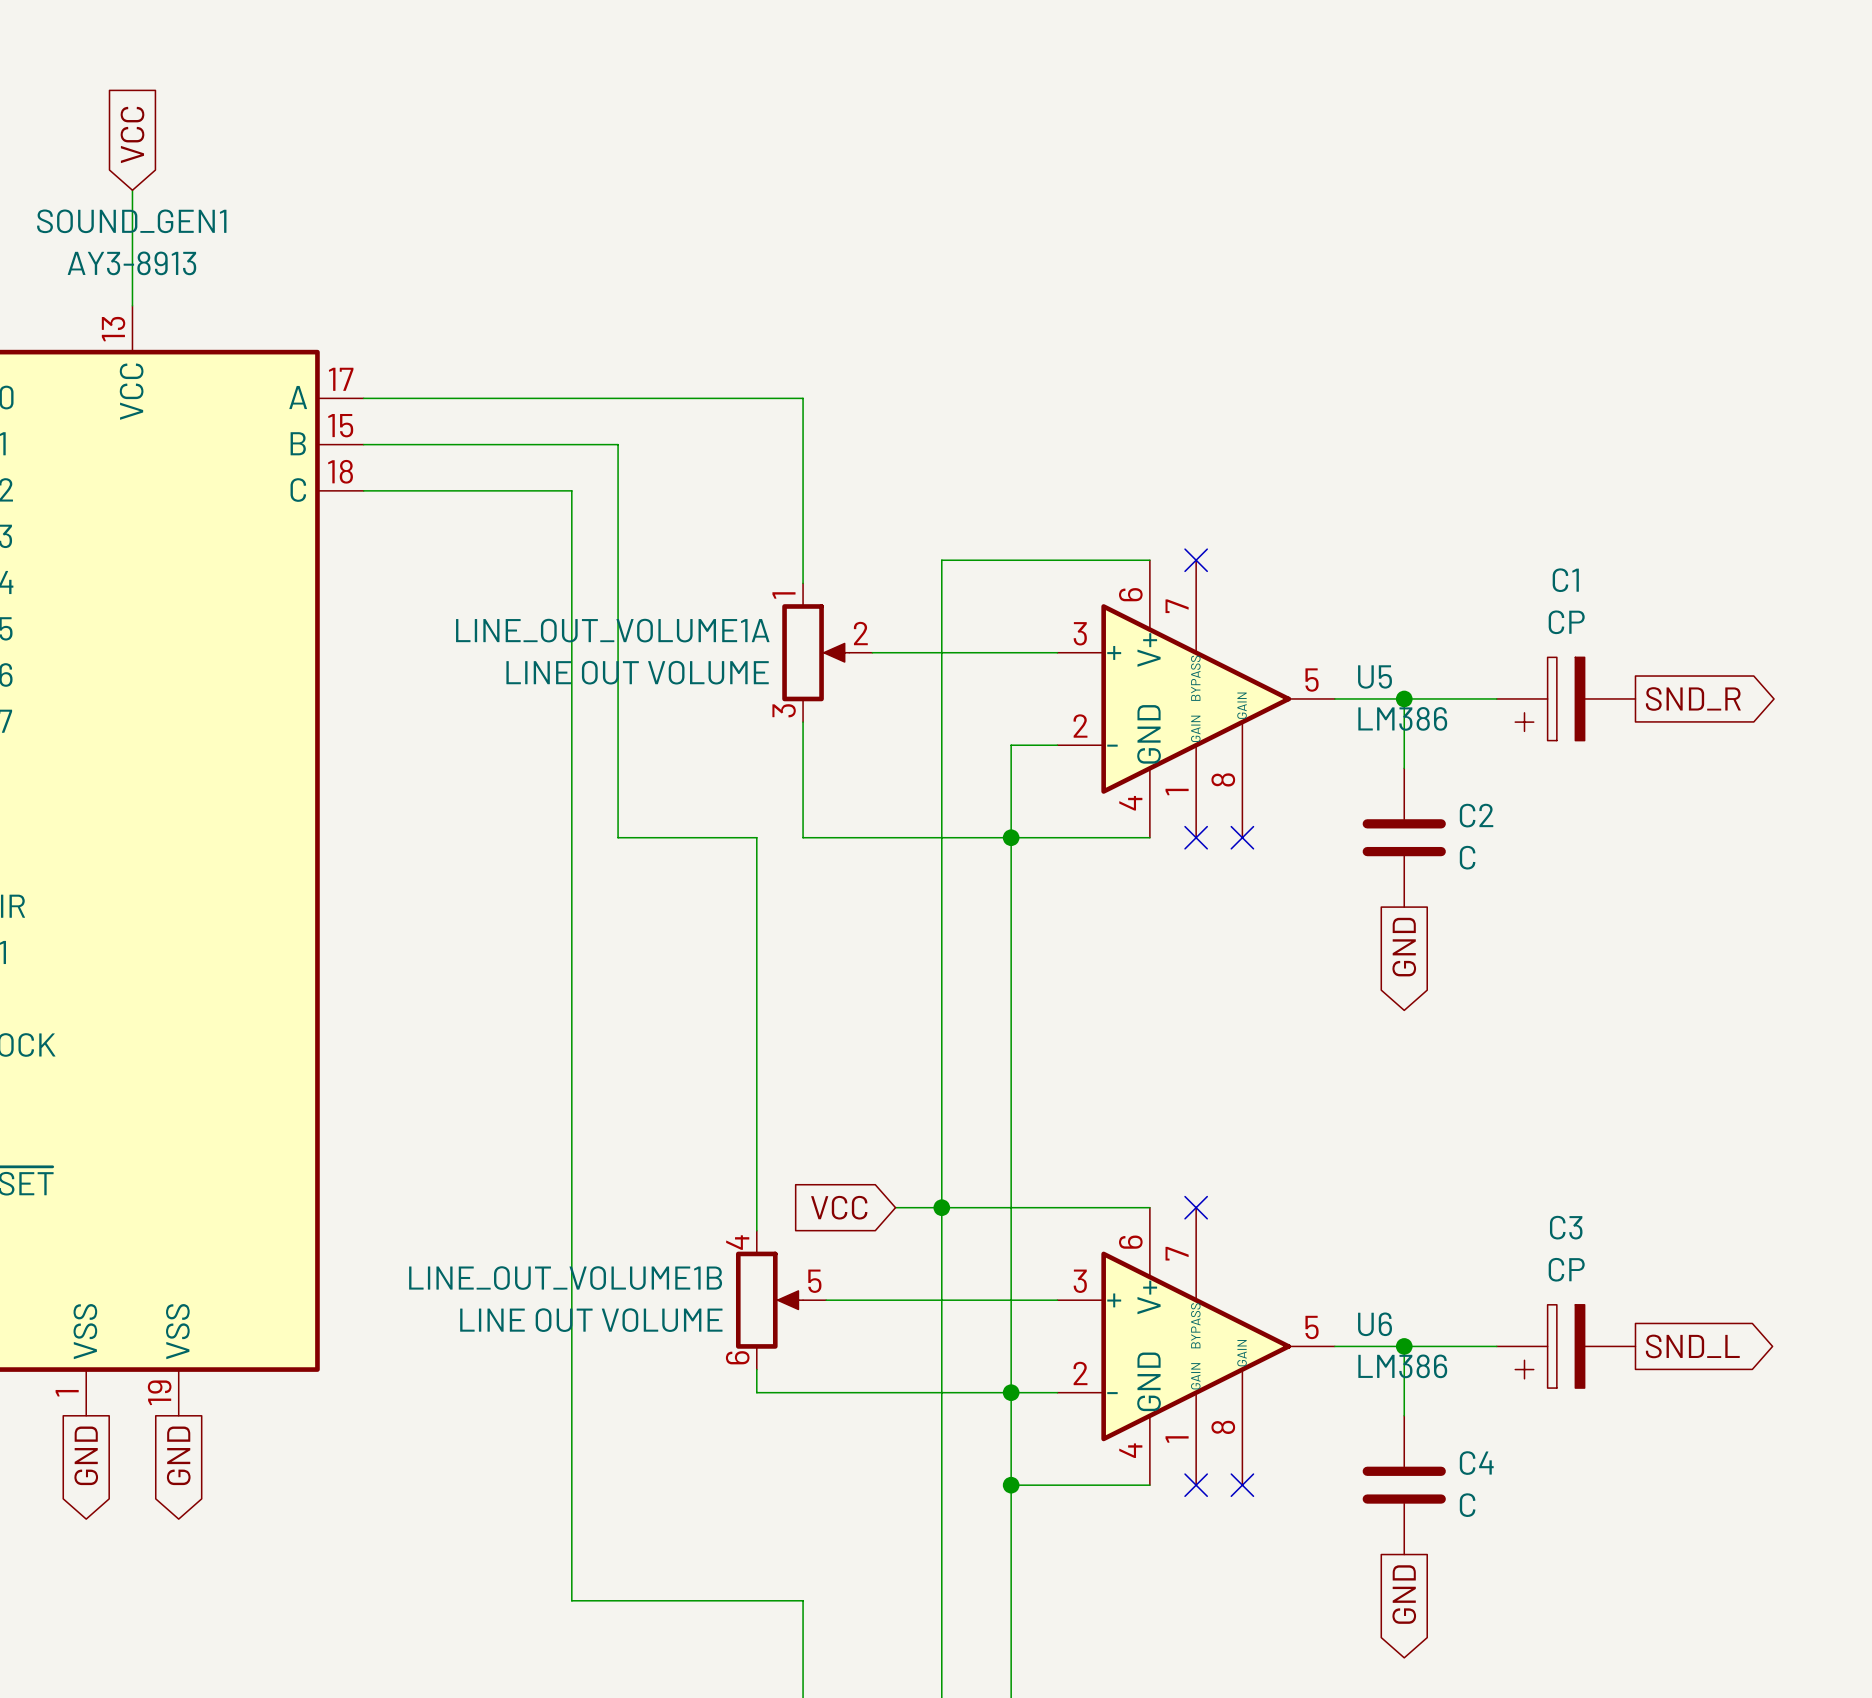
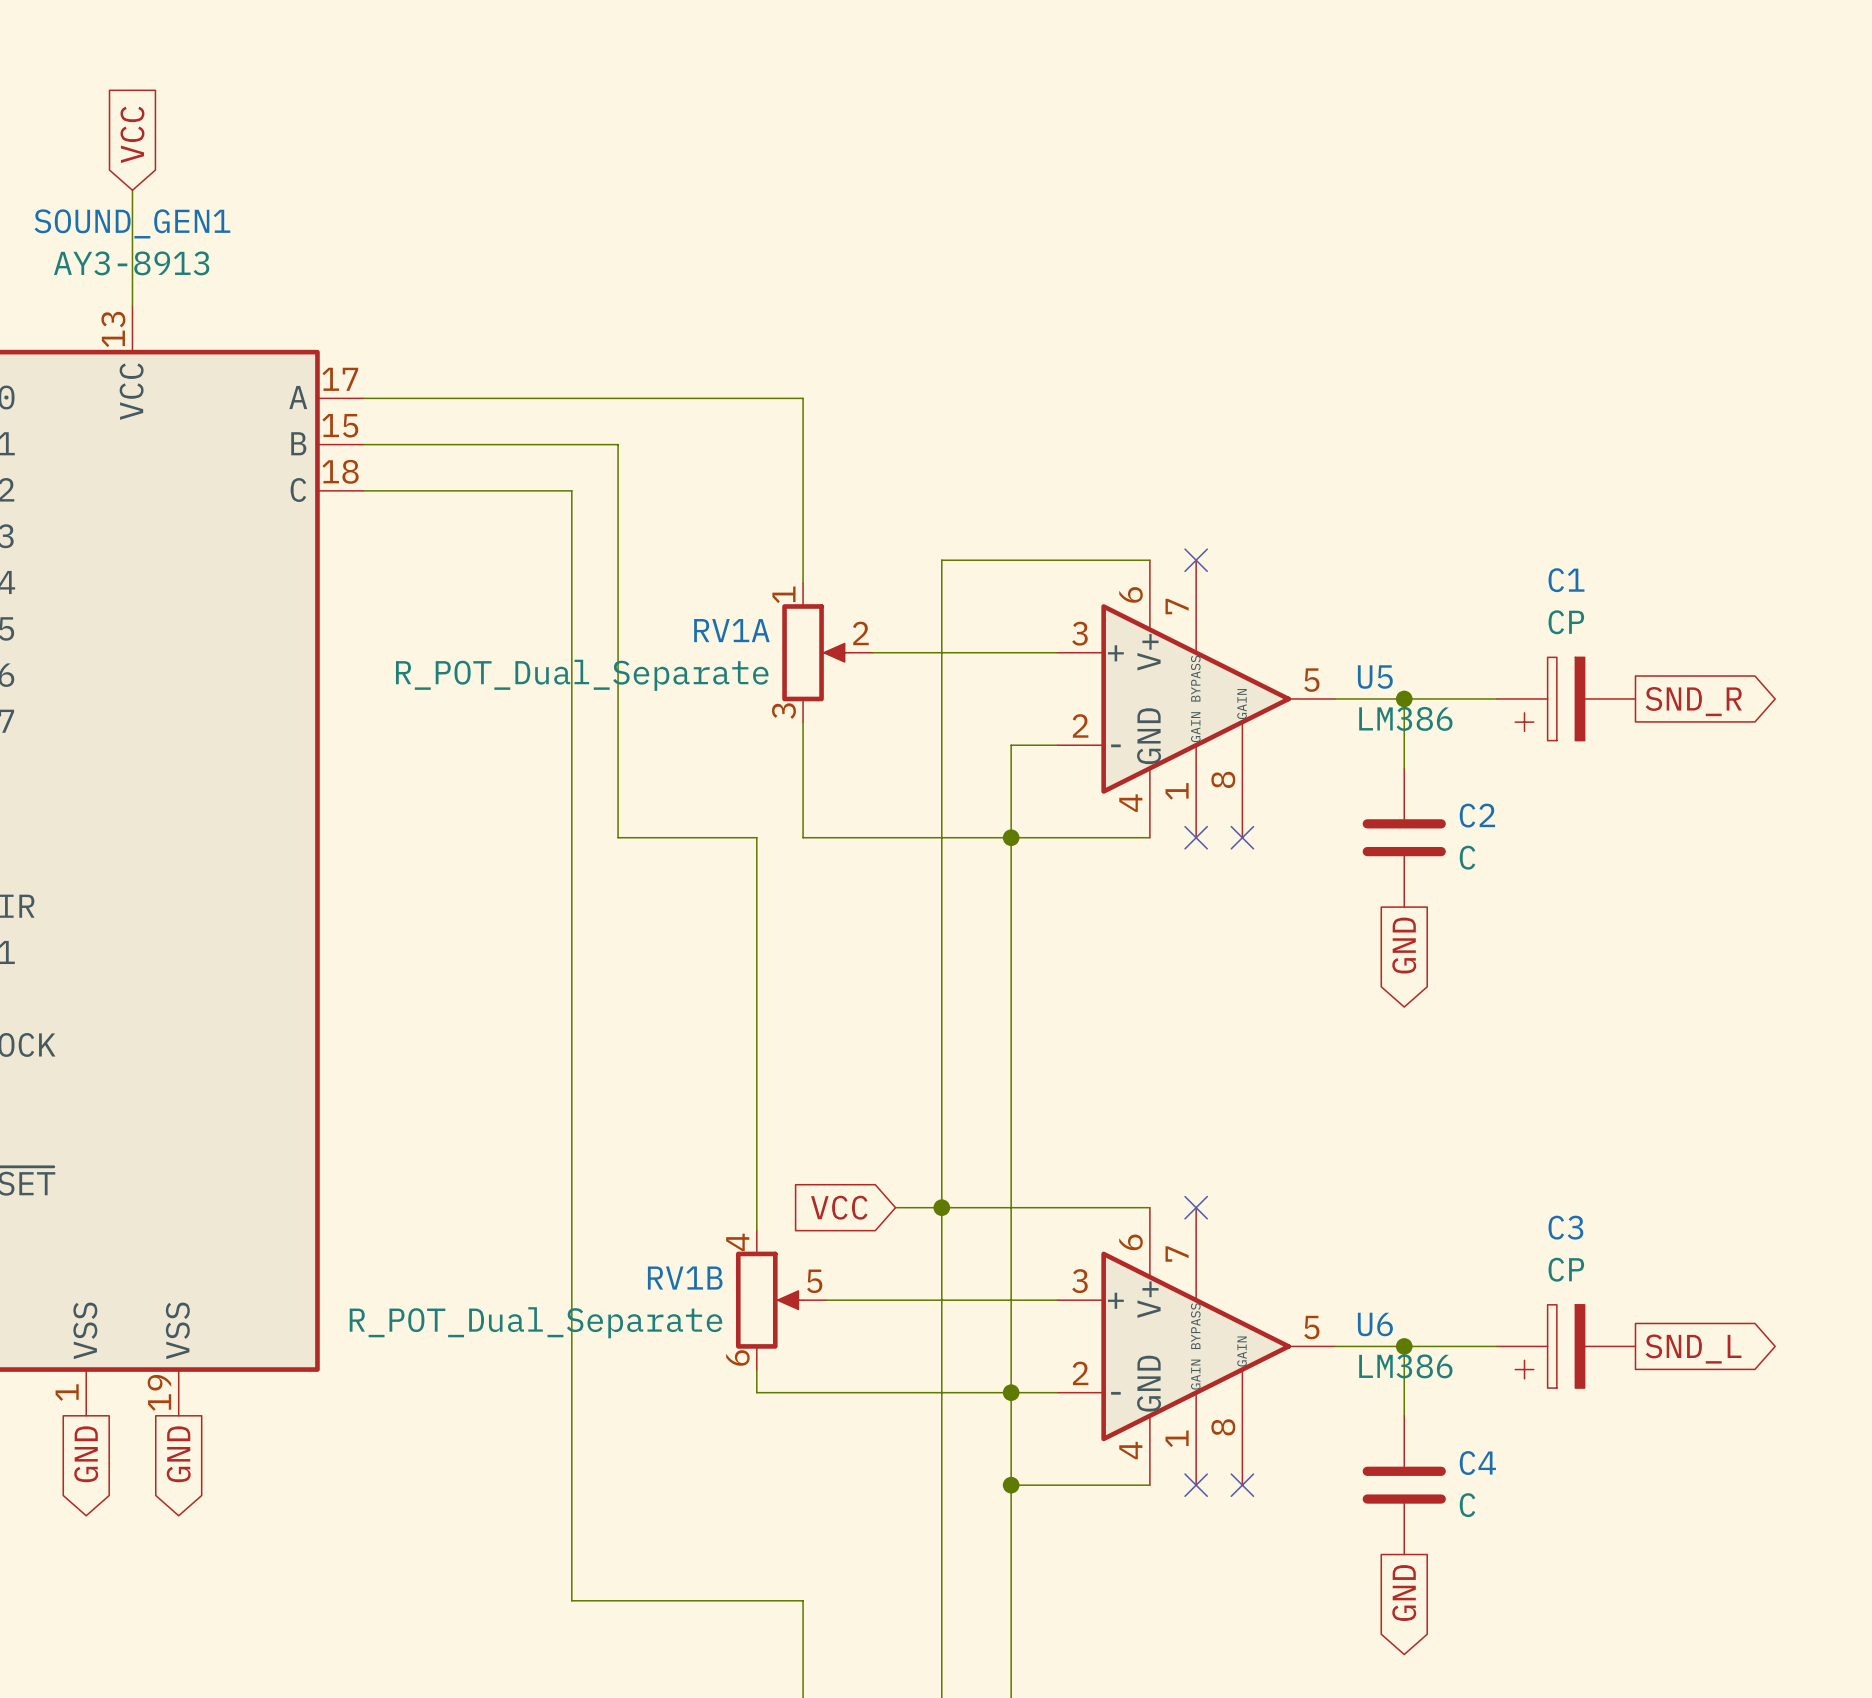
LINE_OUT_VOLUME1A name: LINE_OUT_VOLUME1A (612, 630) -> RV1A (731, 630)
LINE_OUT_VOLUME1A value: LINE OUT VOLUME (637, 672) -> R_POT_Dual_Separate (582, 675)
LINE_OUT_VOLUME1B name: LINE_OUT_VOLUME1B (565, 1278) -> RV1B (685, 1278)
LINE_OUT_VOLUME1B value: LINE OUT VOLUME (591, 1320) -> R_POT_Dual_Separate (535, 1322)

